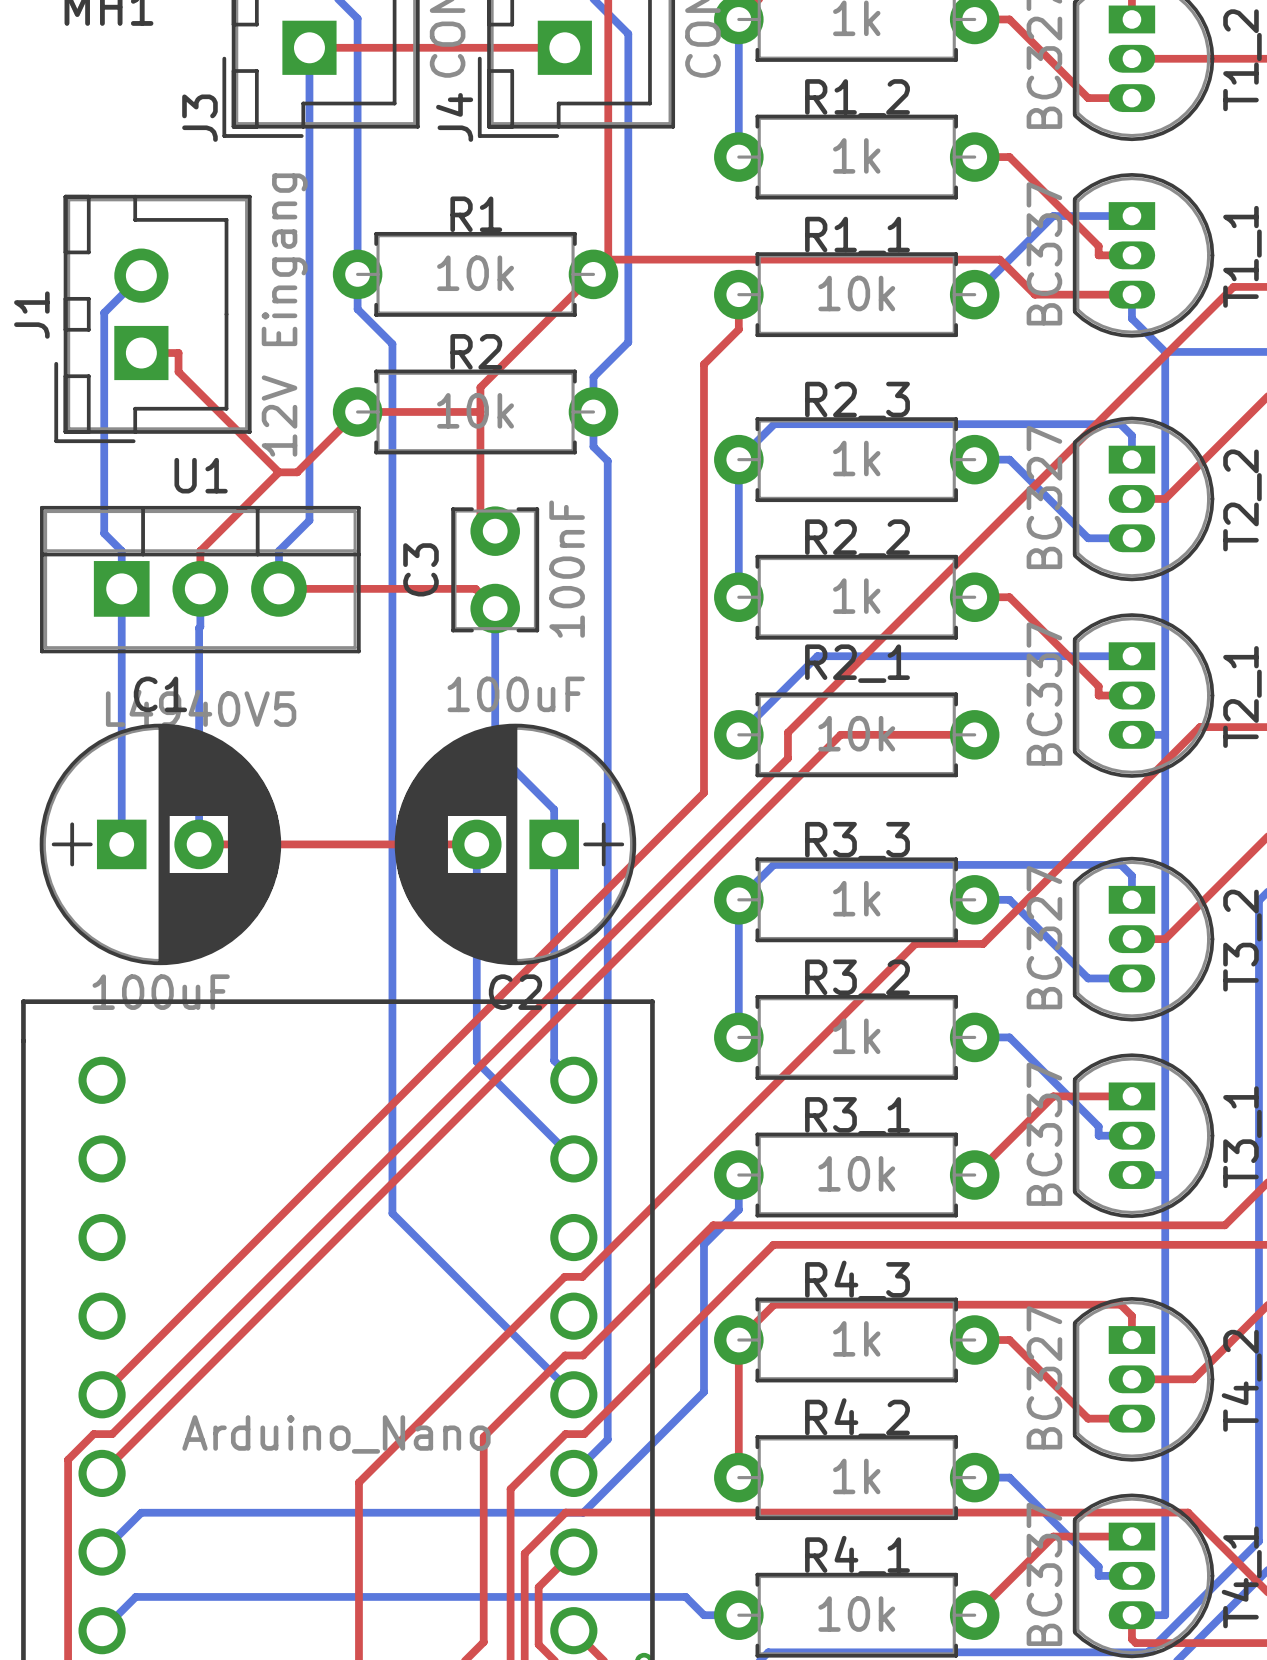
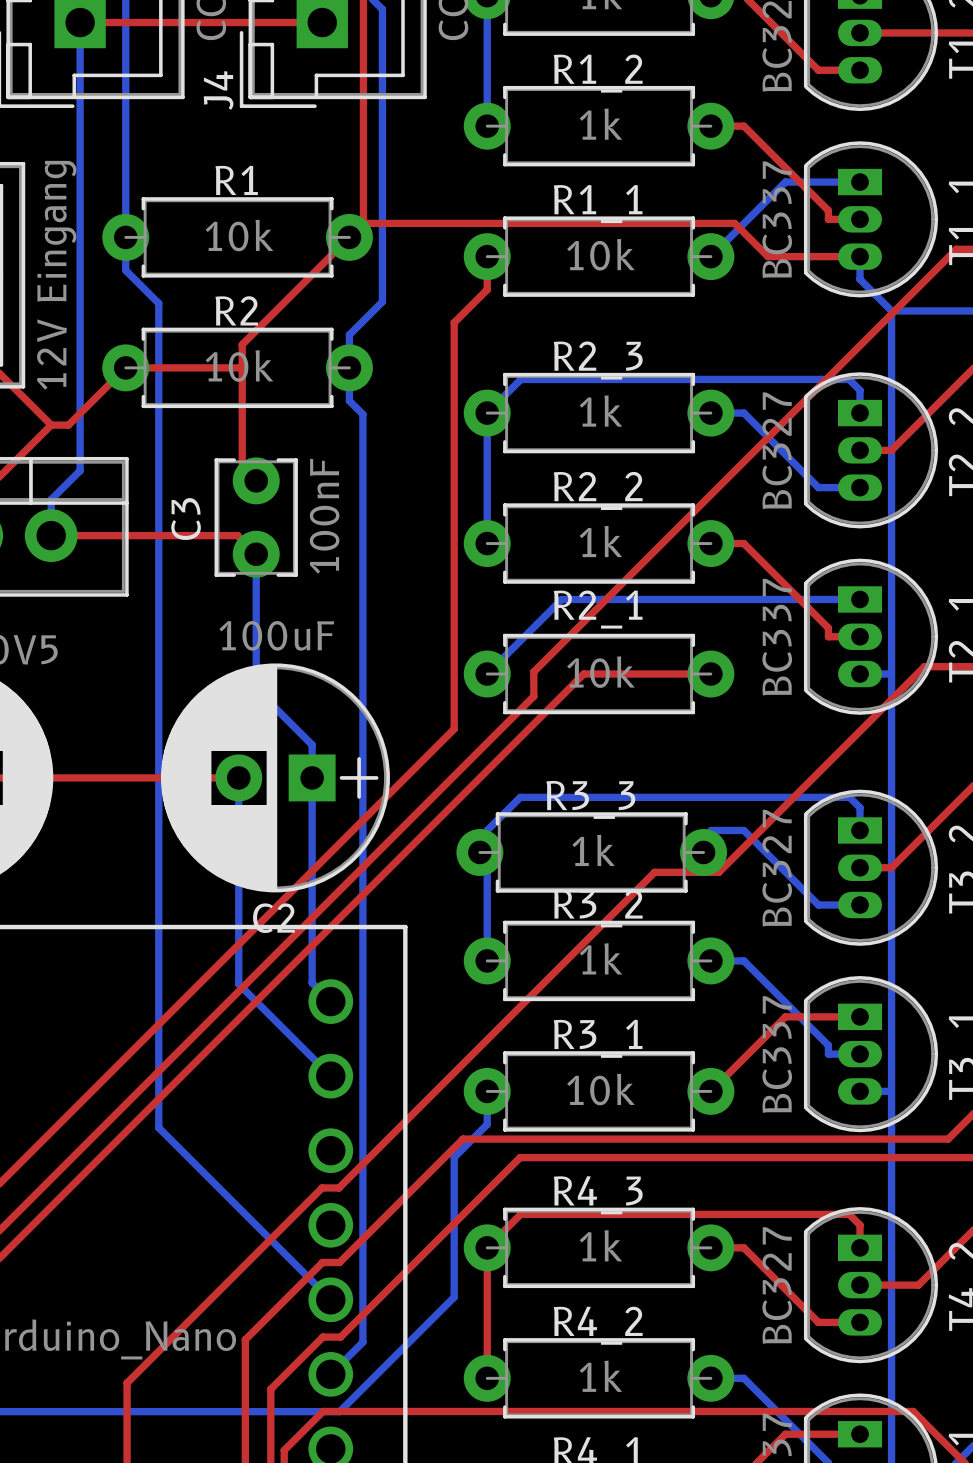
R3_3 position: (856, 899) -> (591, 852)

